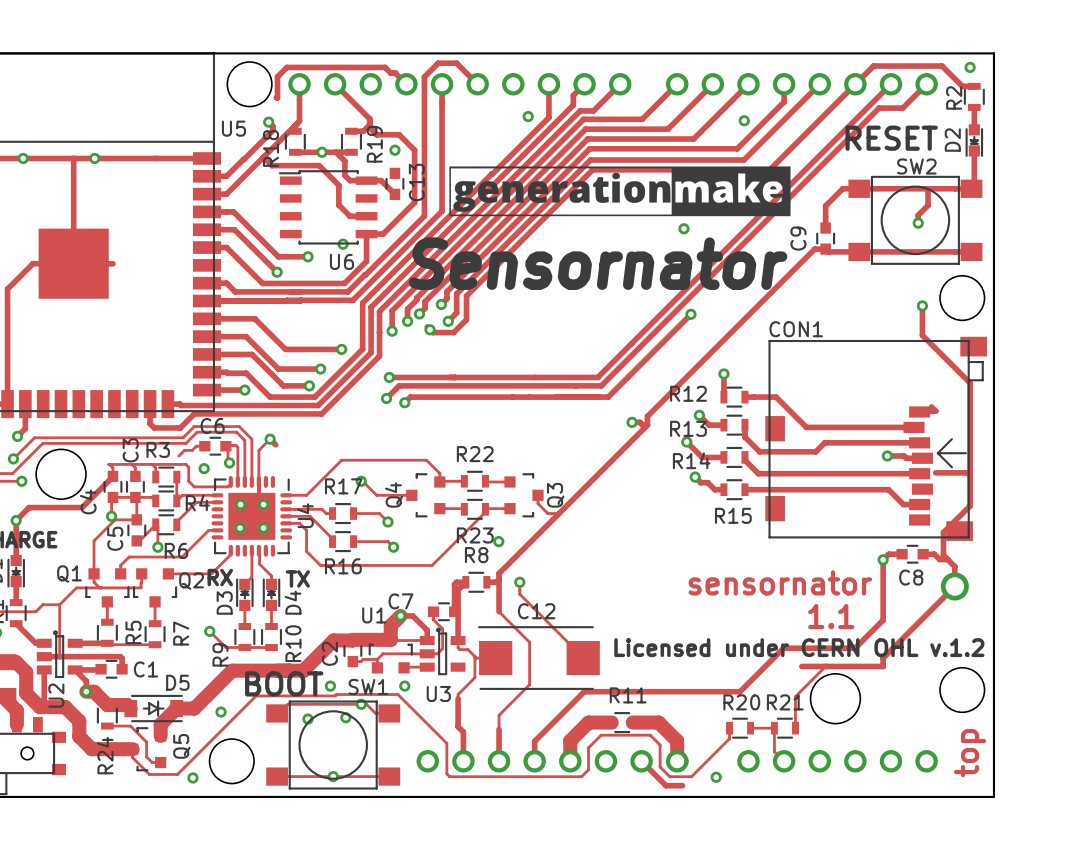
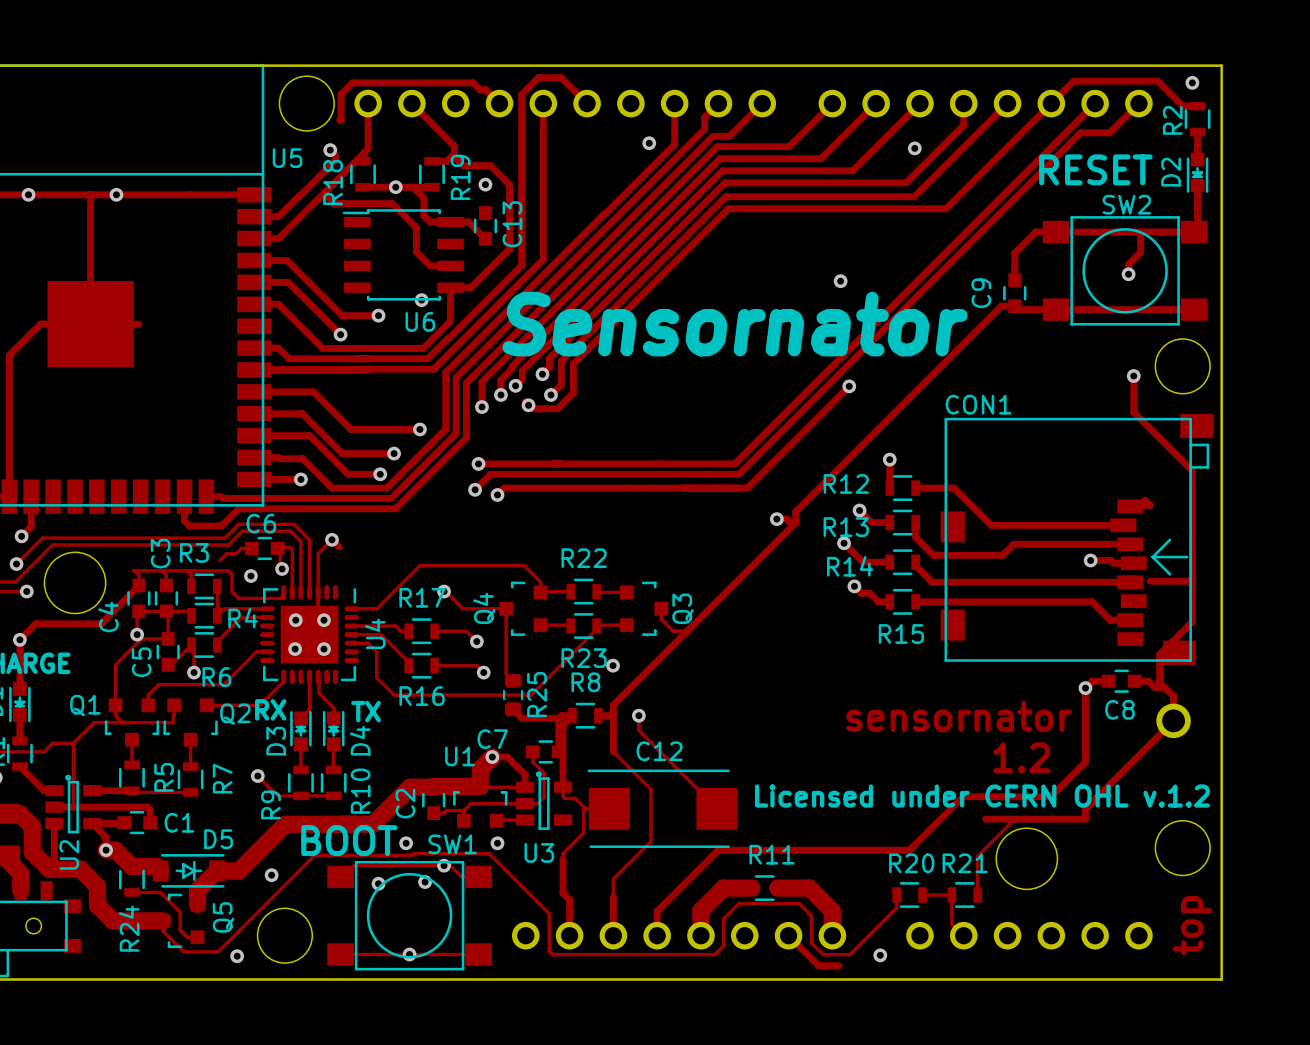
drawing: [449, 166, 791, 217] -> none
track: none -> (506, 608) (506, 673) (513, 680)
R25: none -> (513, 694)
track: none -> (513, 709) (522, 718) (558, 718)
text: 1.1 (831, 616) -> 1.2 (1021, 757)

